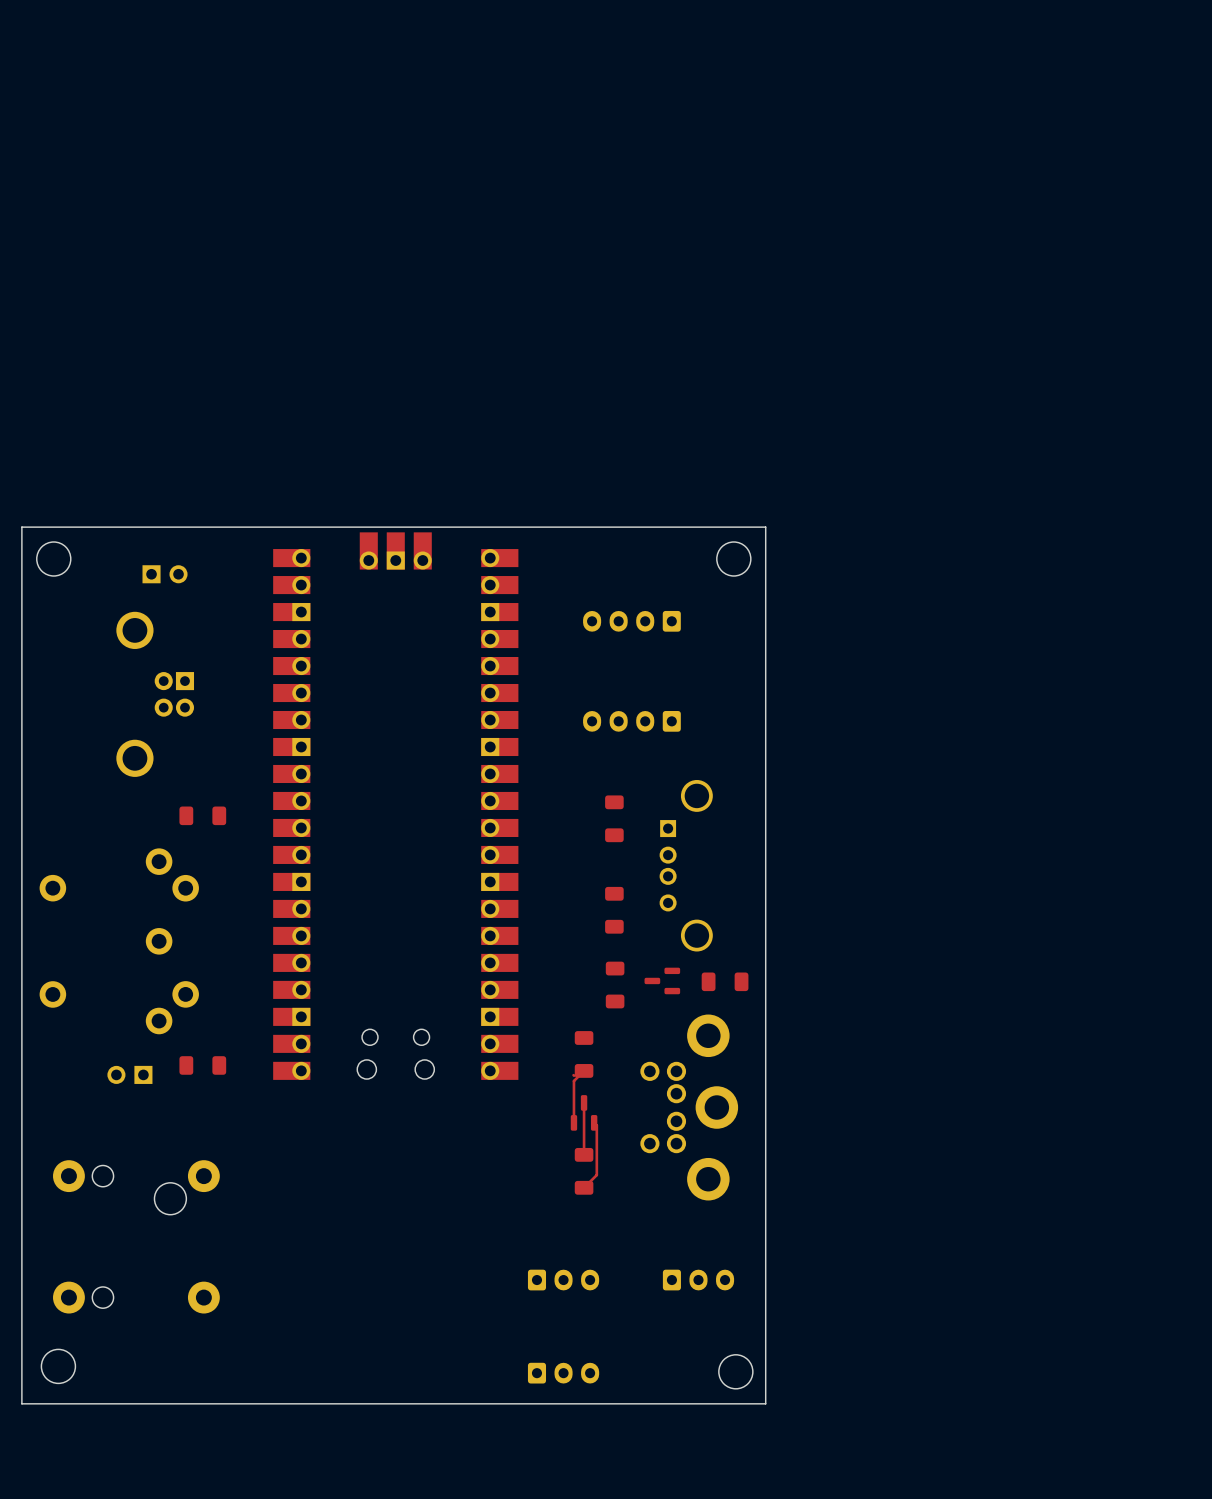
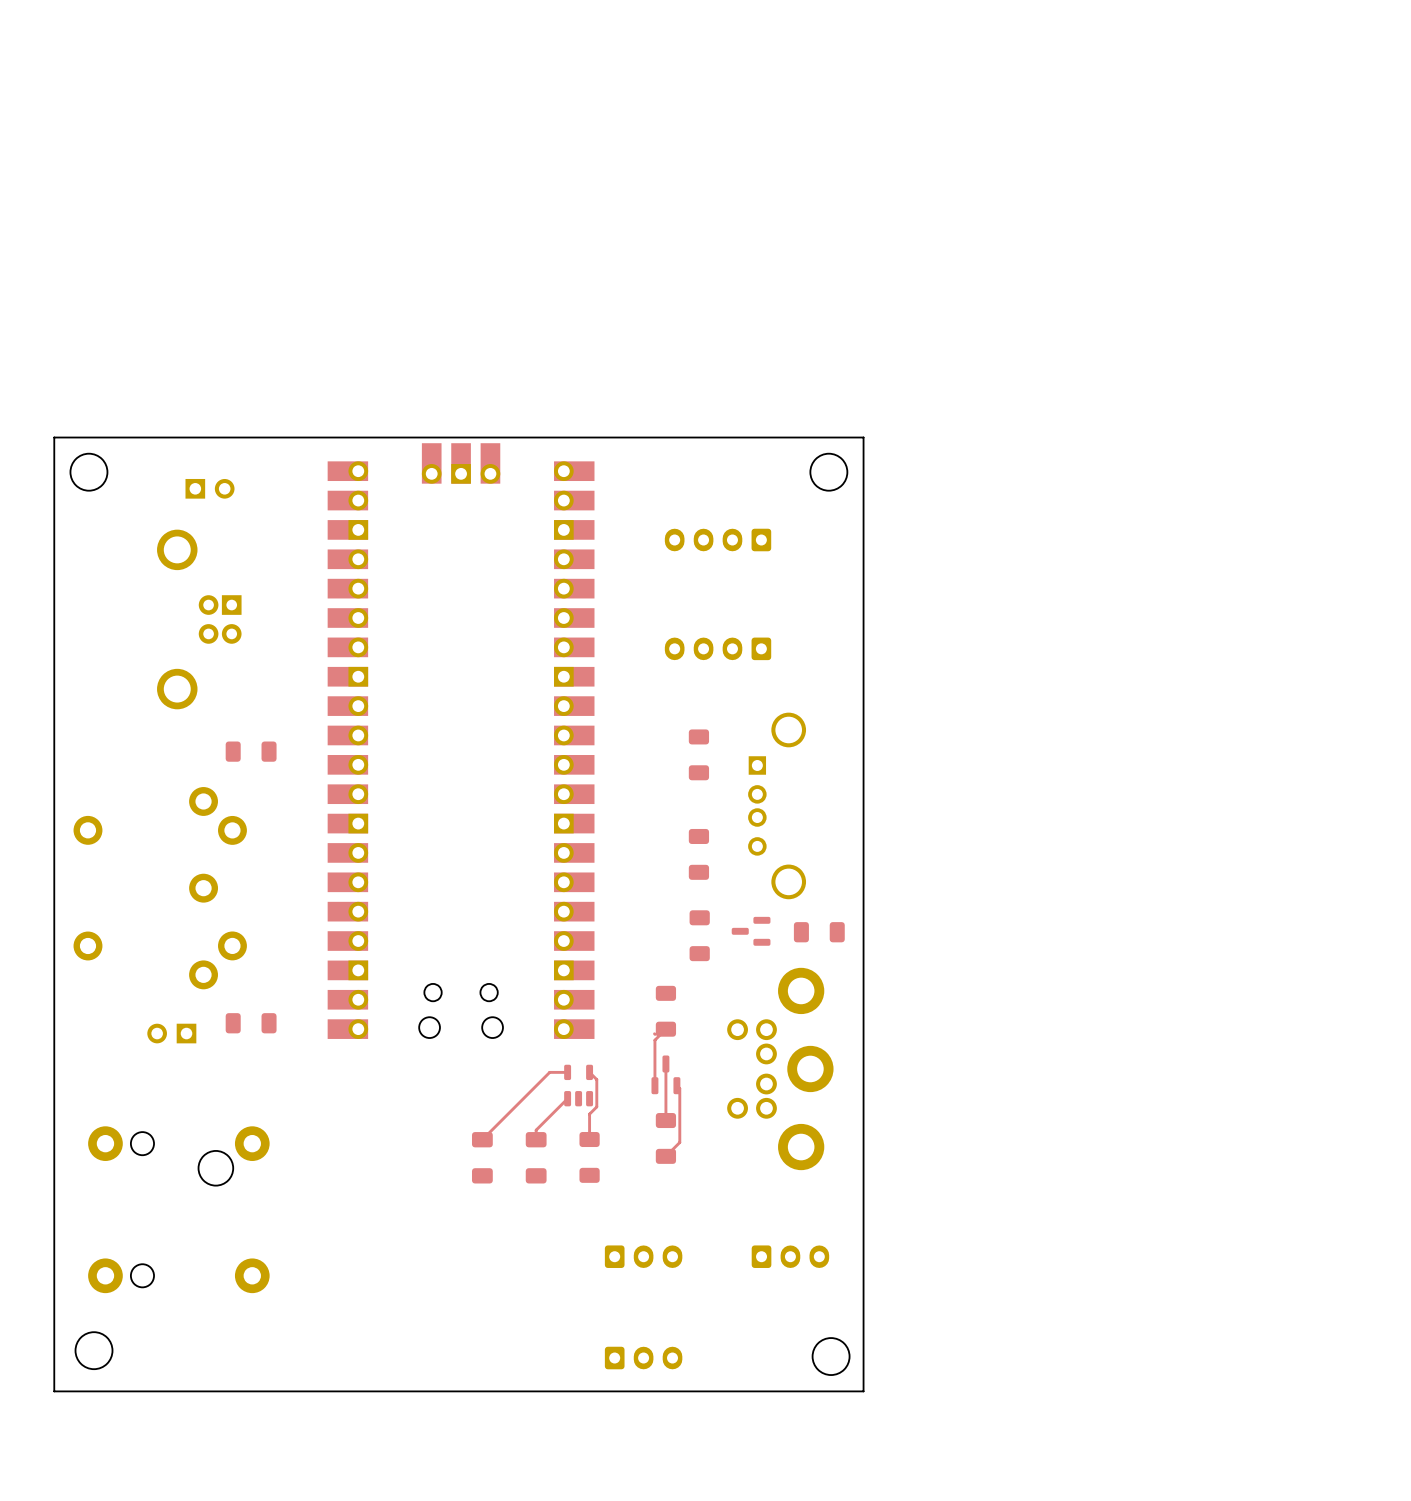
top track: none -> (567, 1072) (549, 1072) (482, 1139)
top track: none -> (589, 1072) (596, 1079) (596, 1106) (589, 1114) (589, 1139)
part: none -> (578, 1085)
top track: none -> (567, 1098) (536, 1130) (536, 1139)
part: none -> (589, 1157)
part: none -> (482, 1157)
part: none -> (536, 1157)

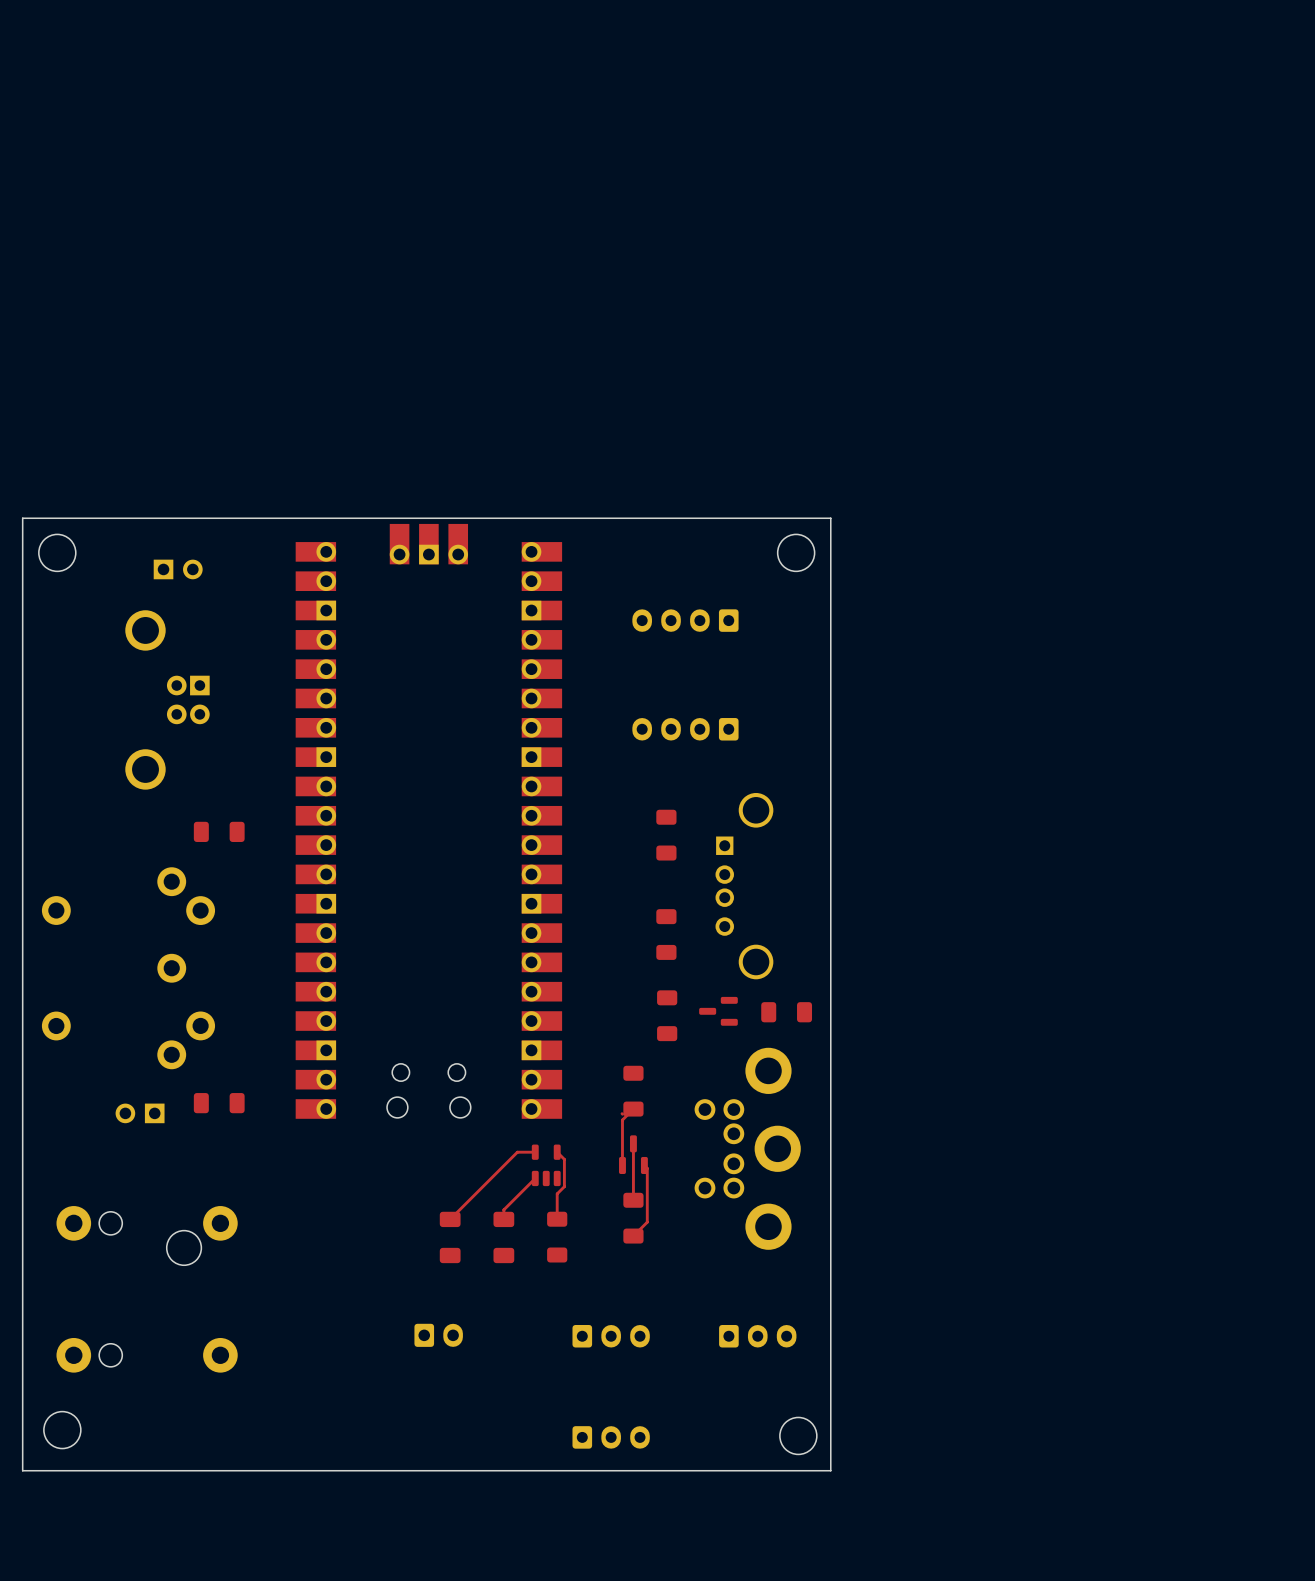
part: none -> (438, 1335)

